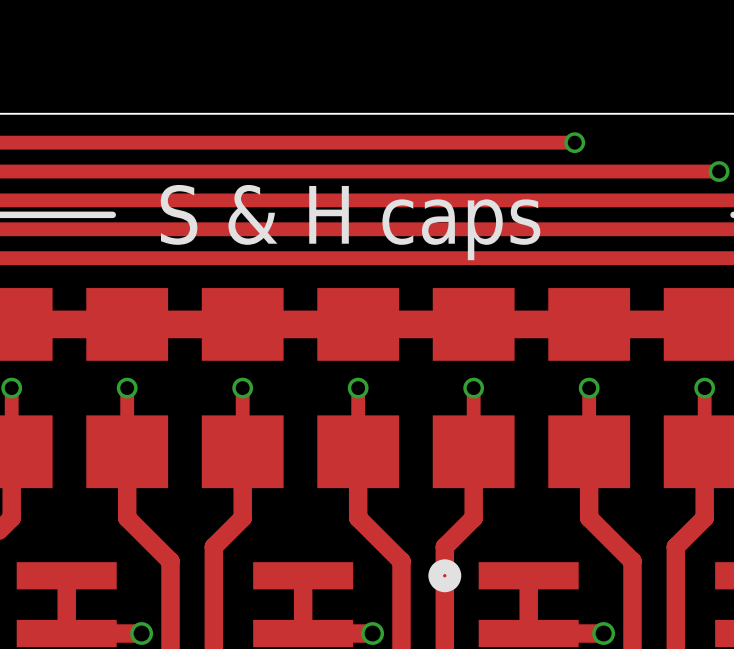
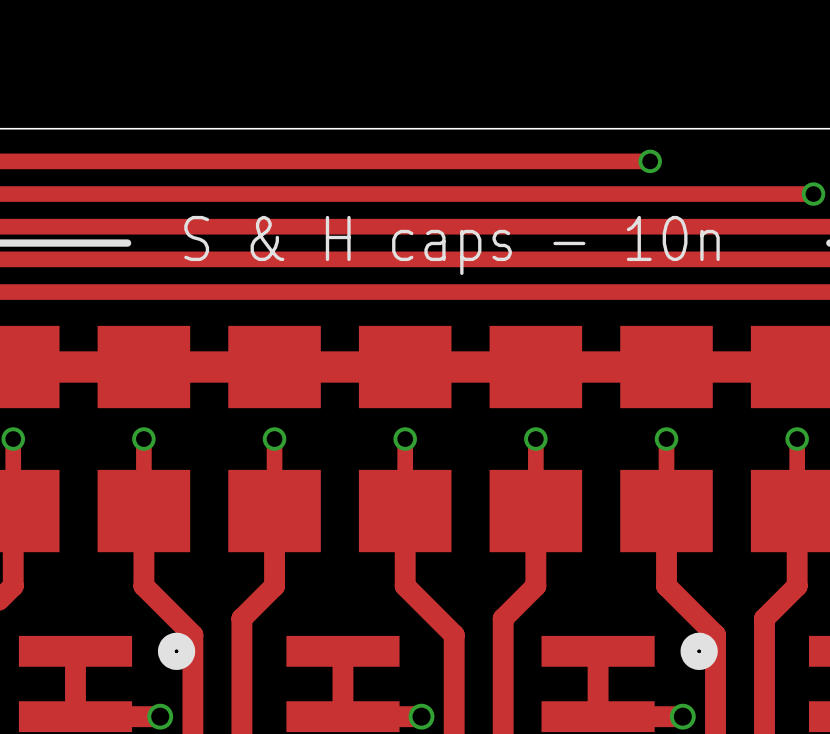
text: S & H caps (350, 222) -> S & H caps - 10n (452, 245)
drawing: none -> [157, 632, 196, 670]
drawing: [428, 559, 462, 593] -> none
drawing: none -> [680, 632, 718, 670]

